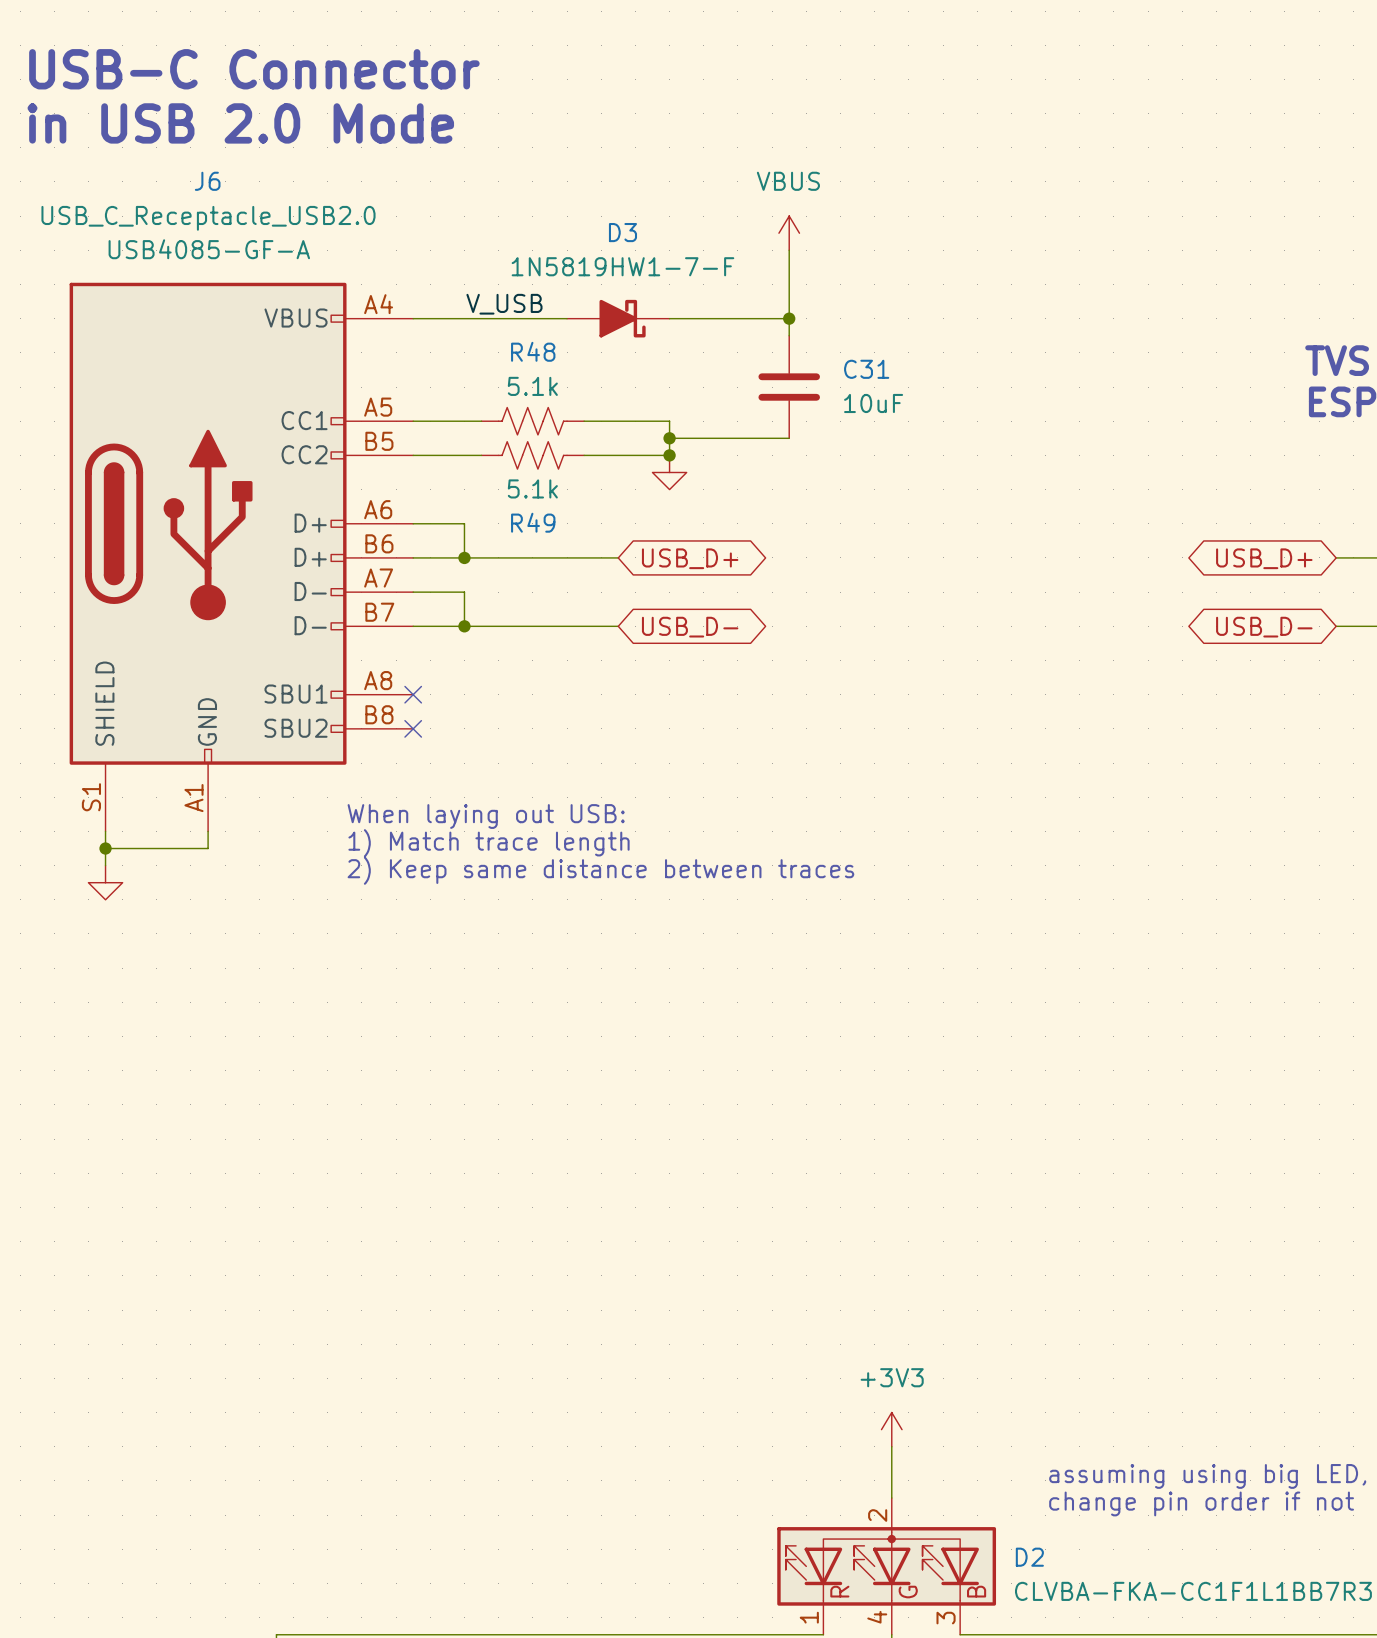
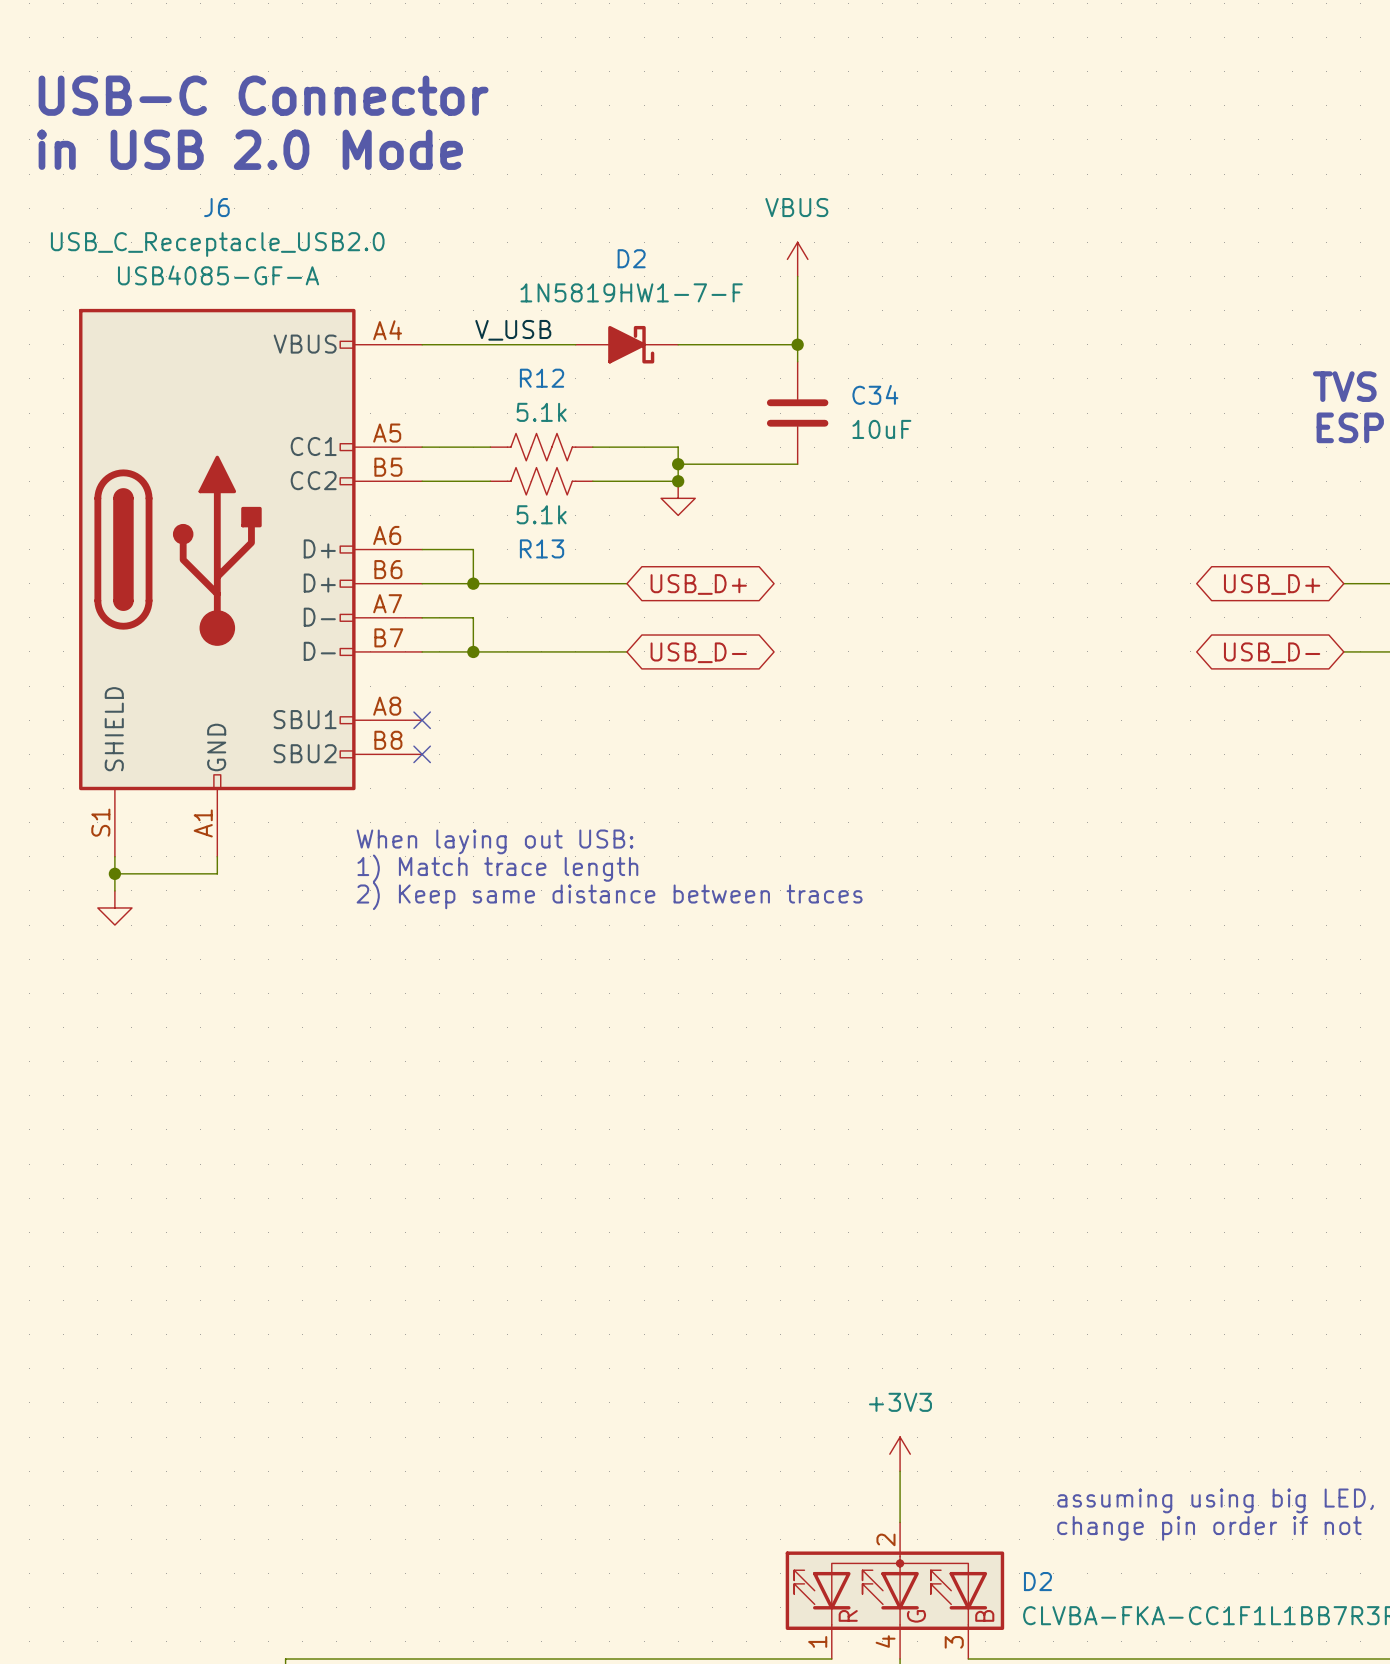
D3 name: D3 (622, 232) -> D2 (631, 258)
R48 name: R48 (533, 351) -> R12 (542, 378)
C31 name: C31 (866, 369) -> C34 (875, 394)
R49 name: R49 (533, 522) -> R13 (542, 548)

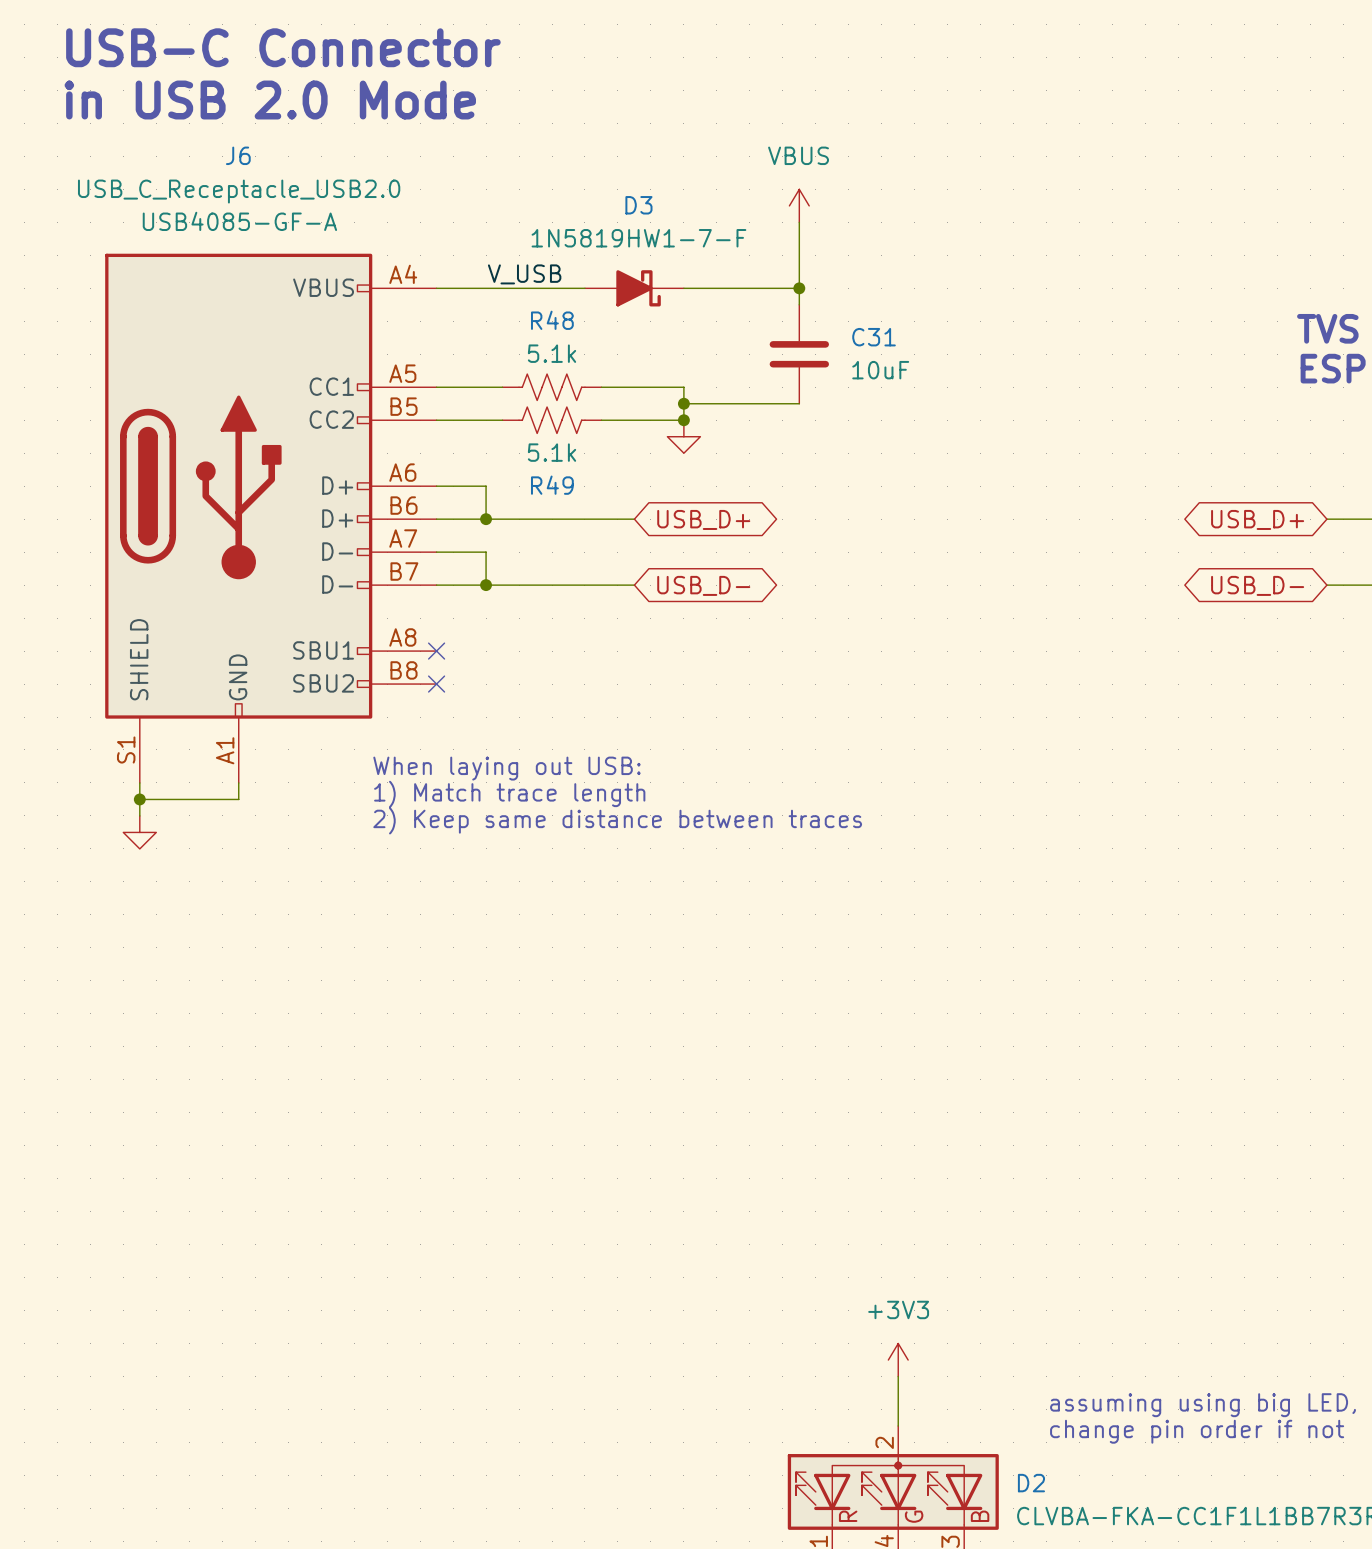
D2 name: D2 (631, 258) -> D3 (638, 205)
R12 name: R12 (542, 378) -> R48 (552, 320)
C34 name: C34 (875, 394) -> C31 (874, 337)
R13 name: R13 (542, 548) -> R49 (552, 485)

